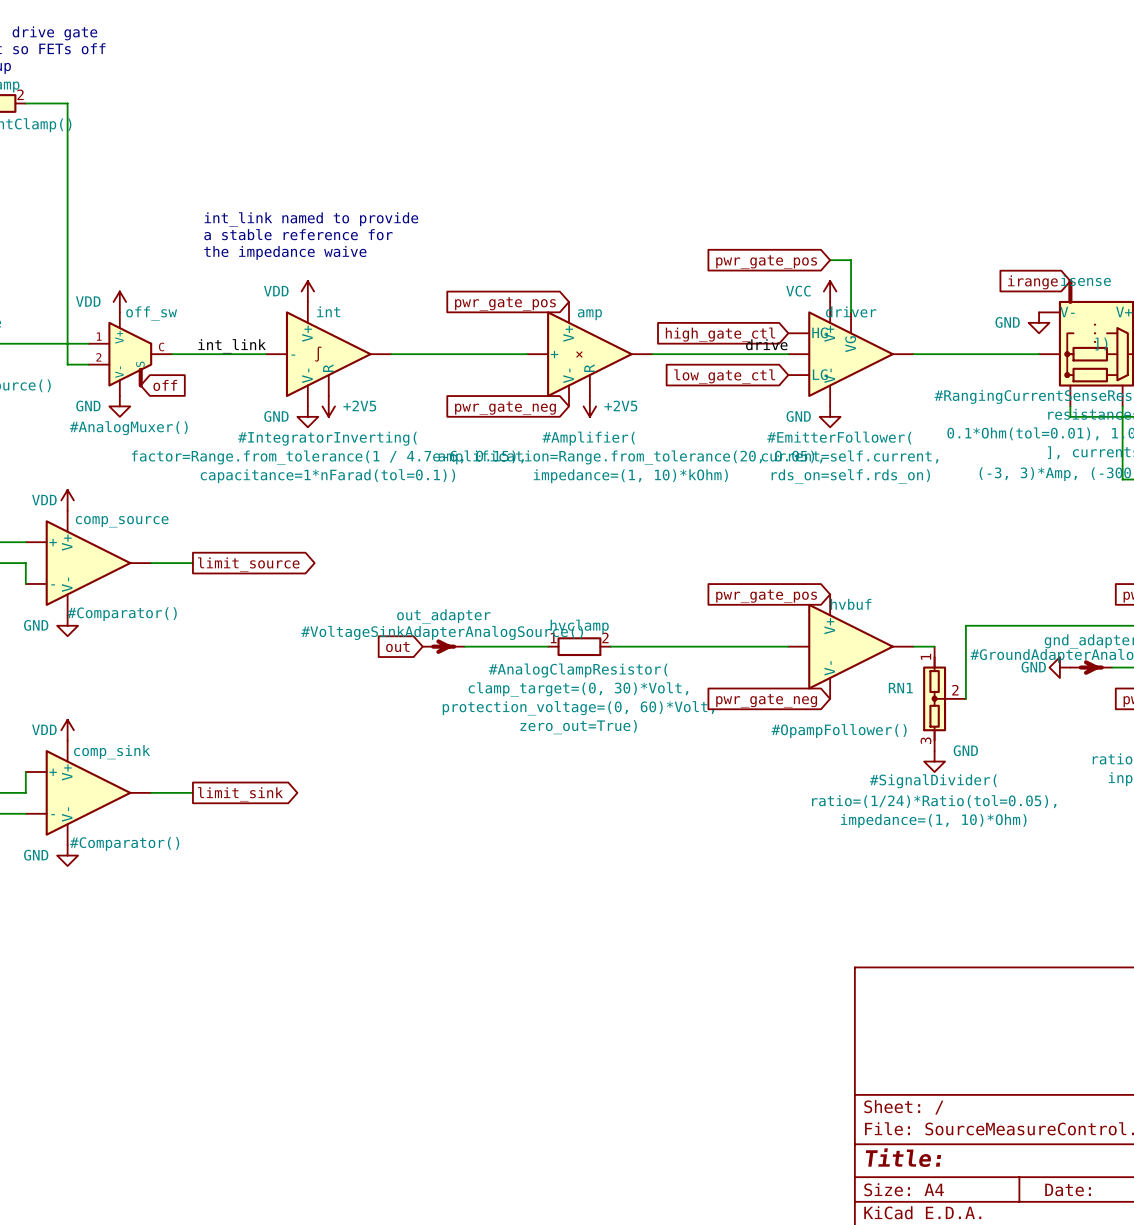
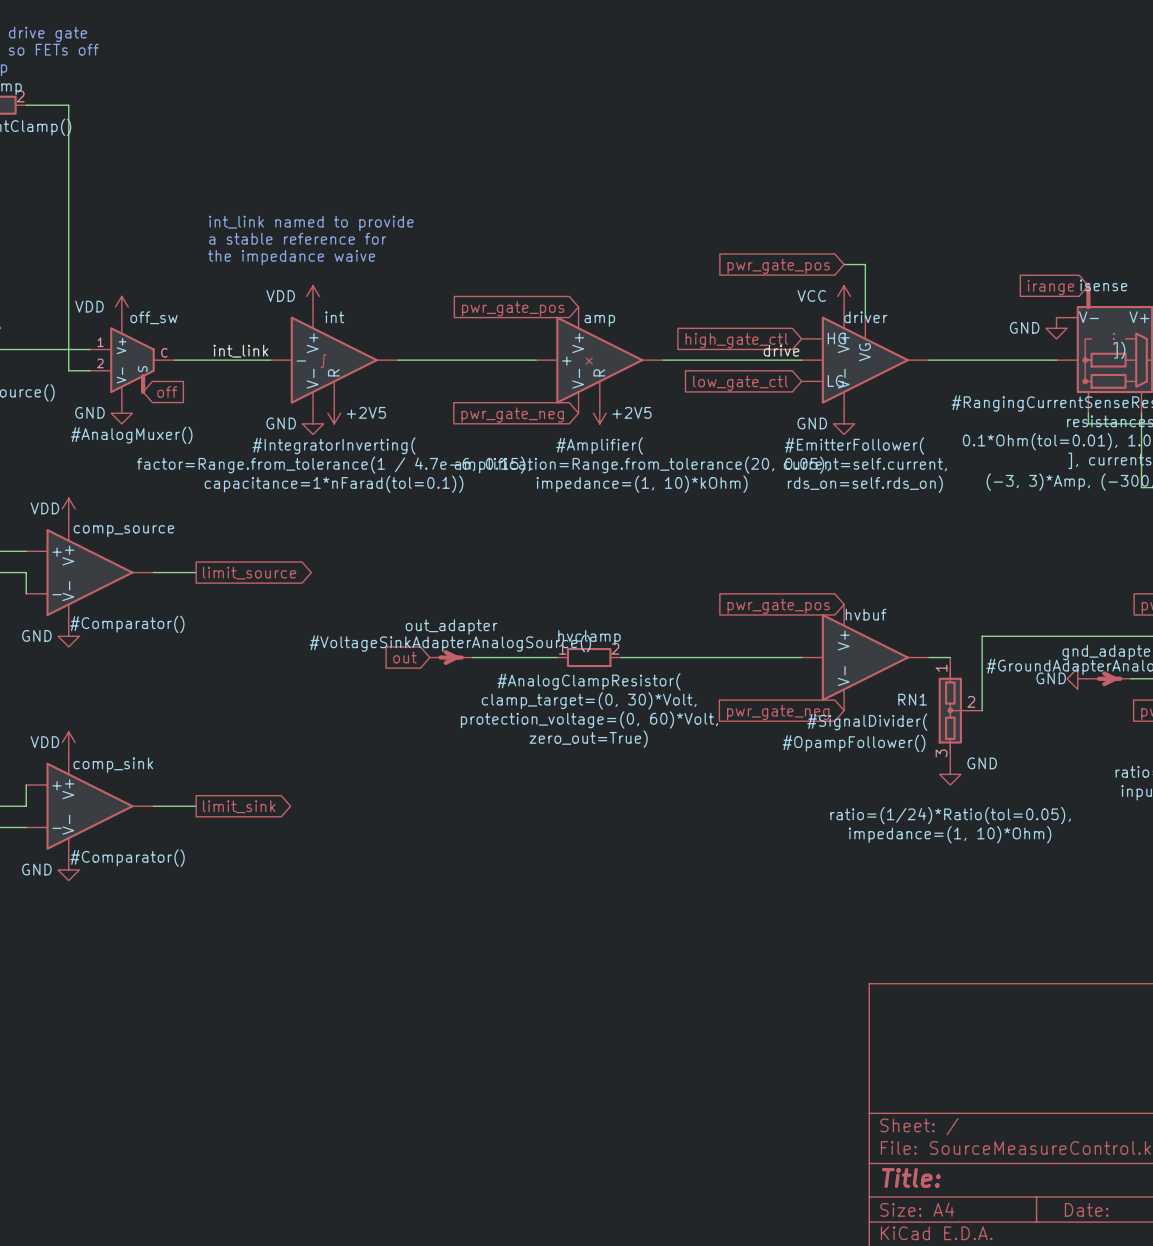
RN1 value position: #SignalDivider( (933, 781) -> #SignalDivider( (867, 722)

